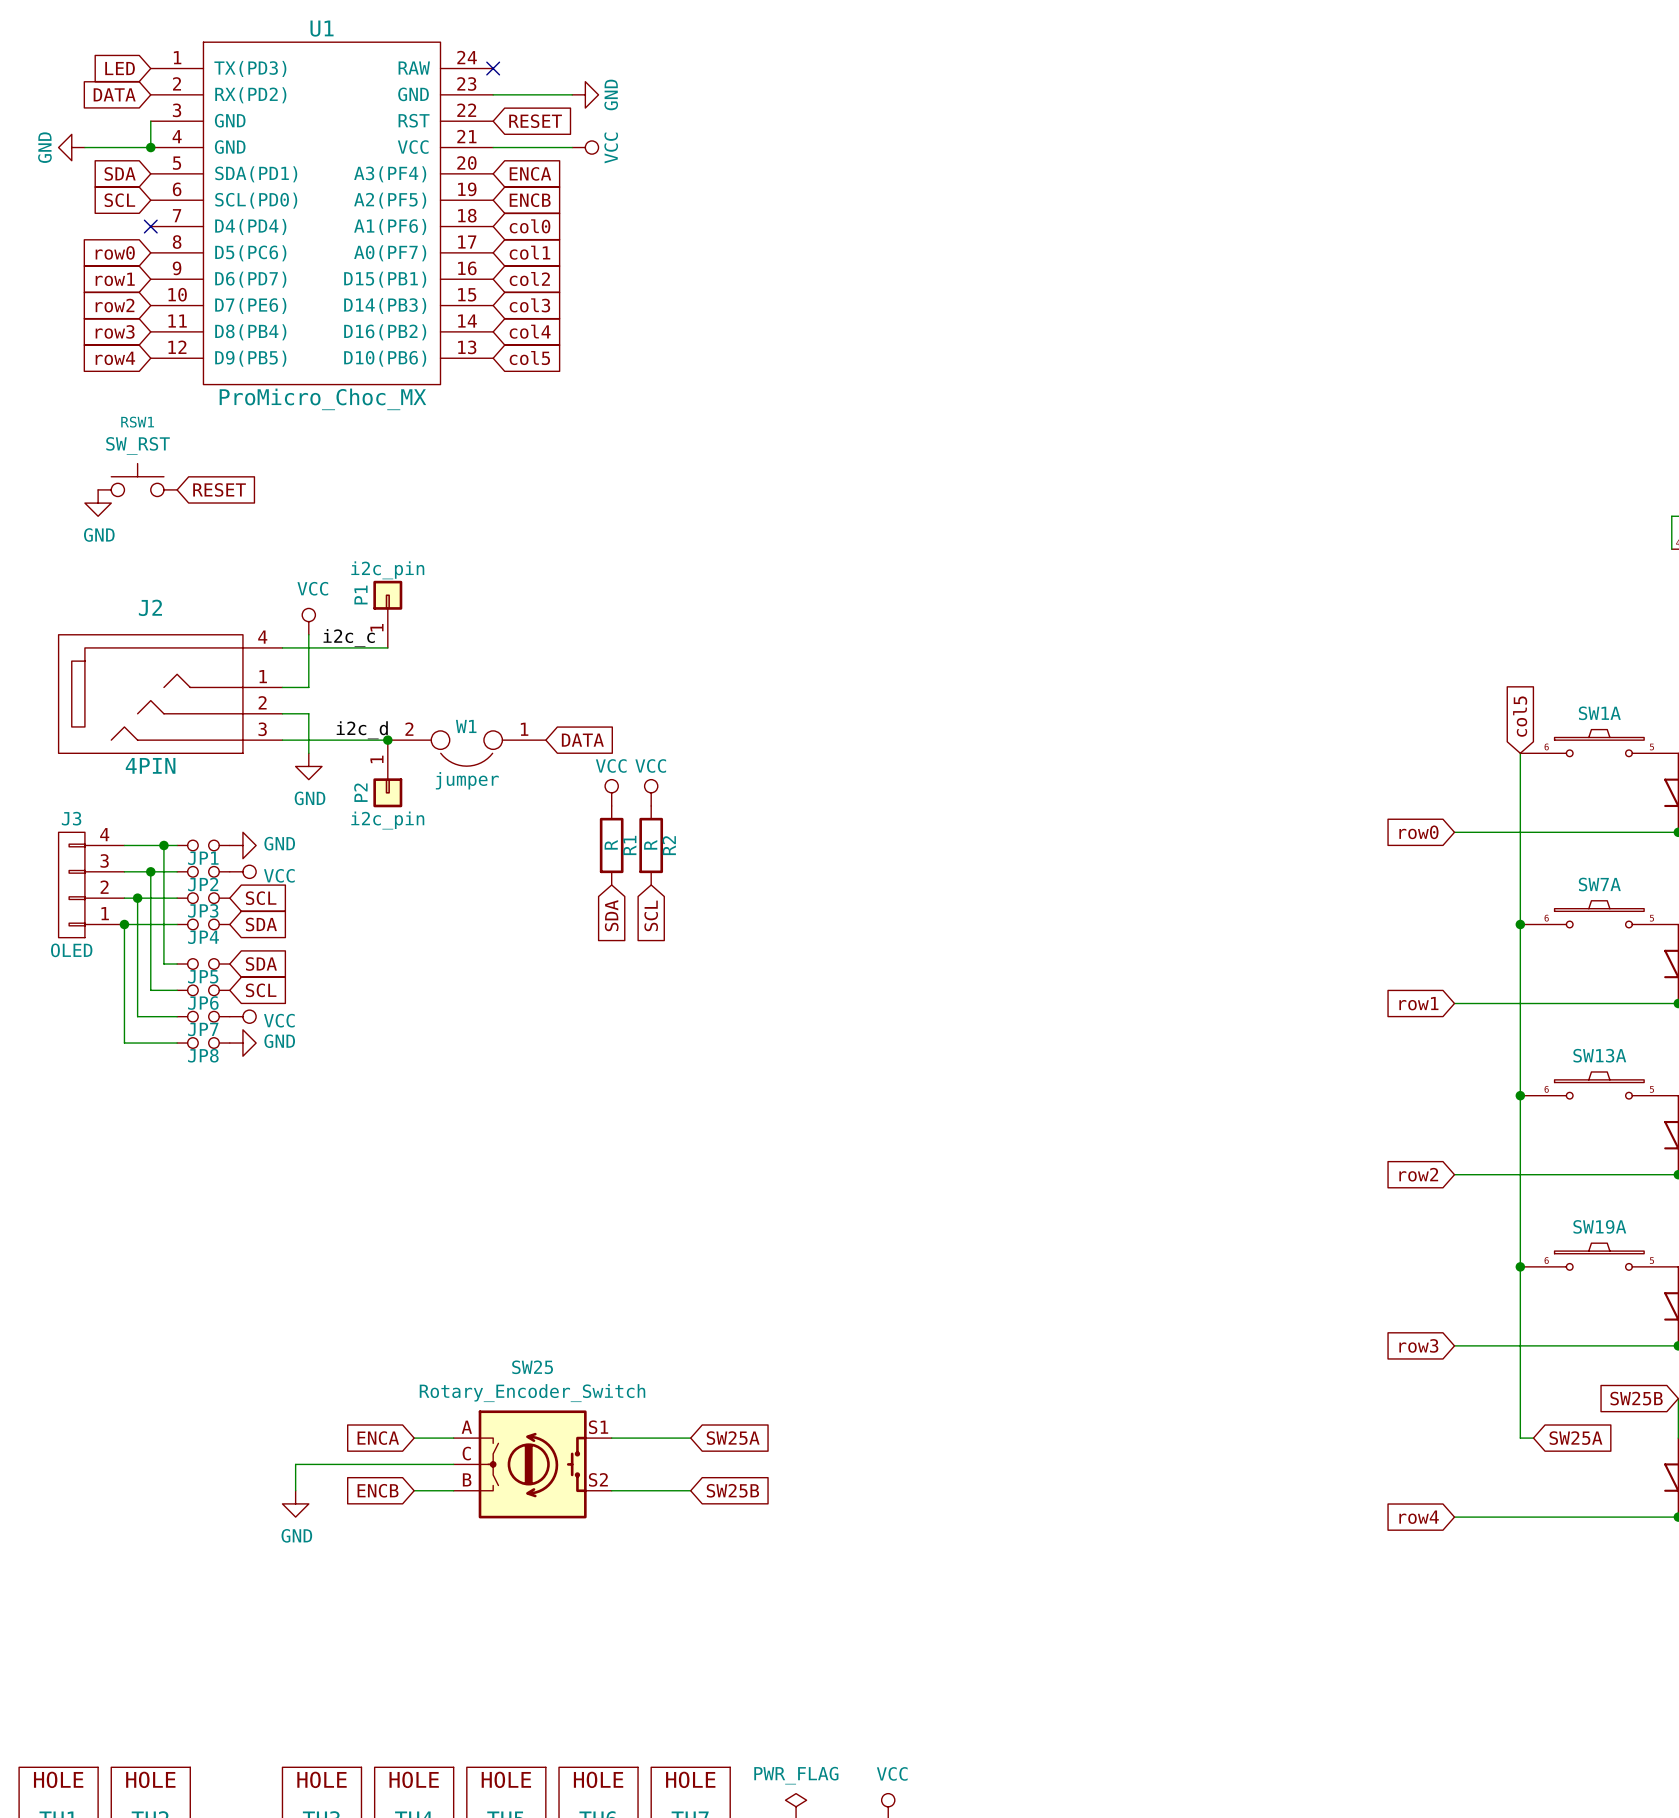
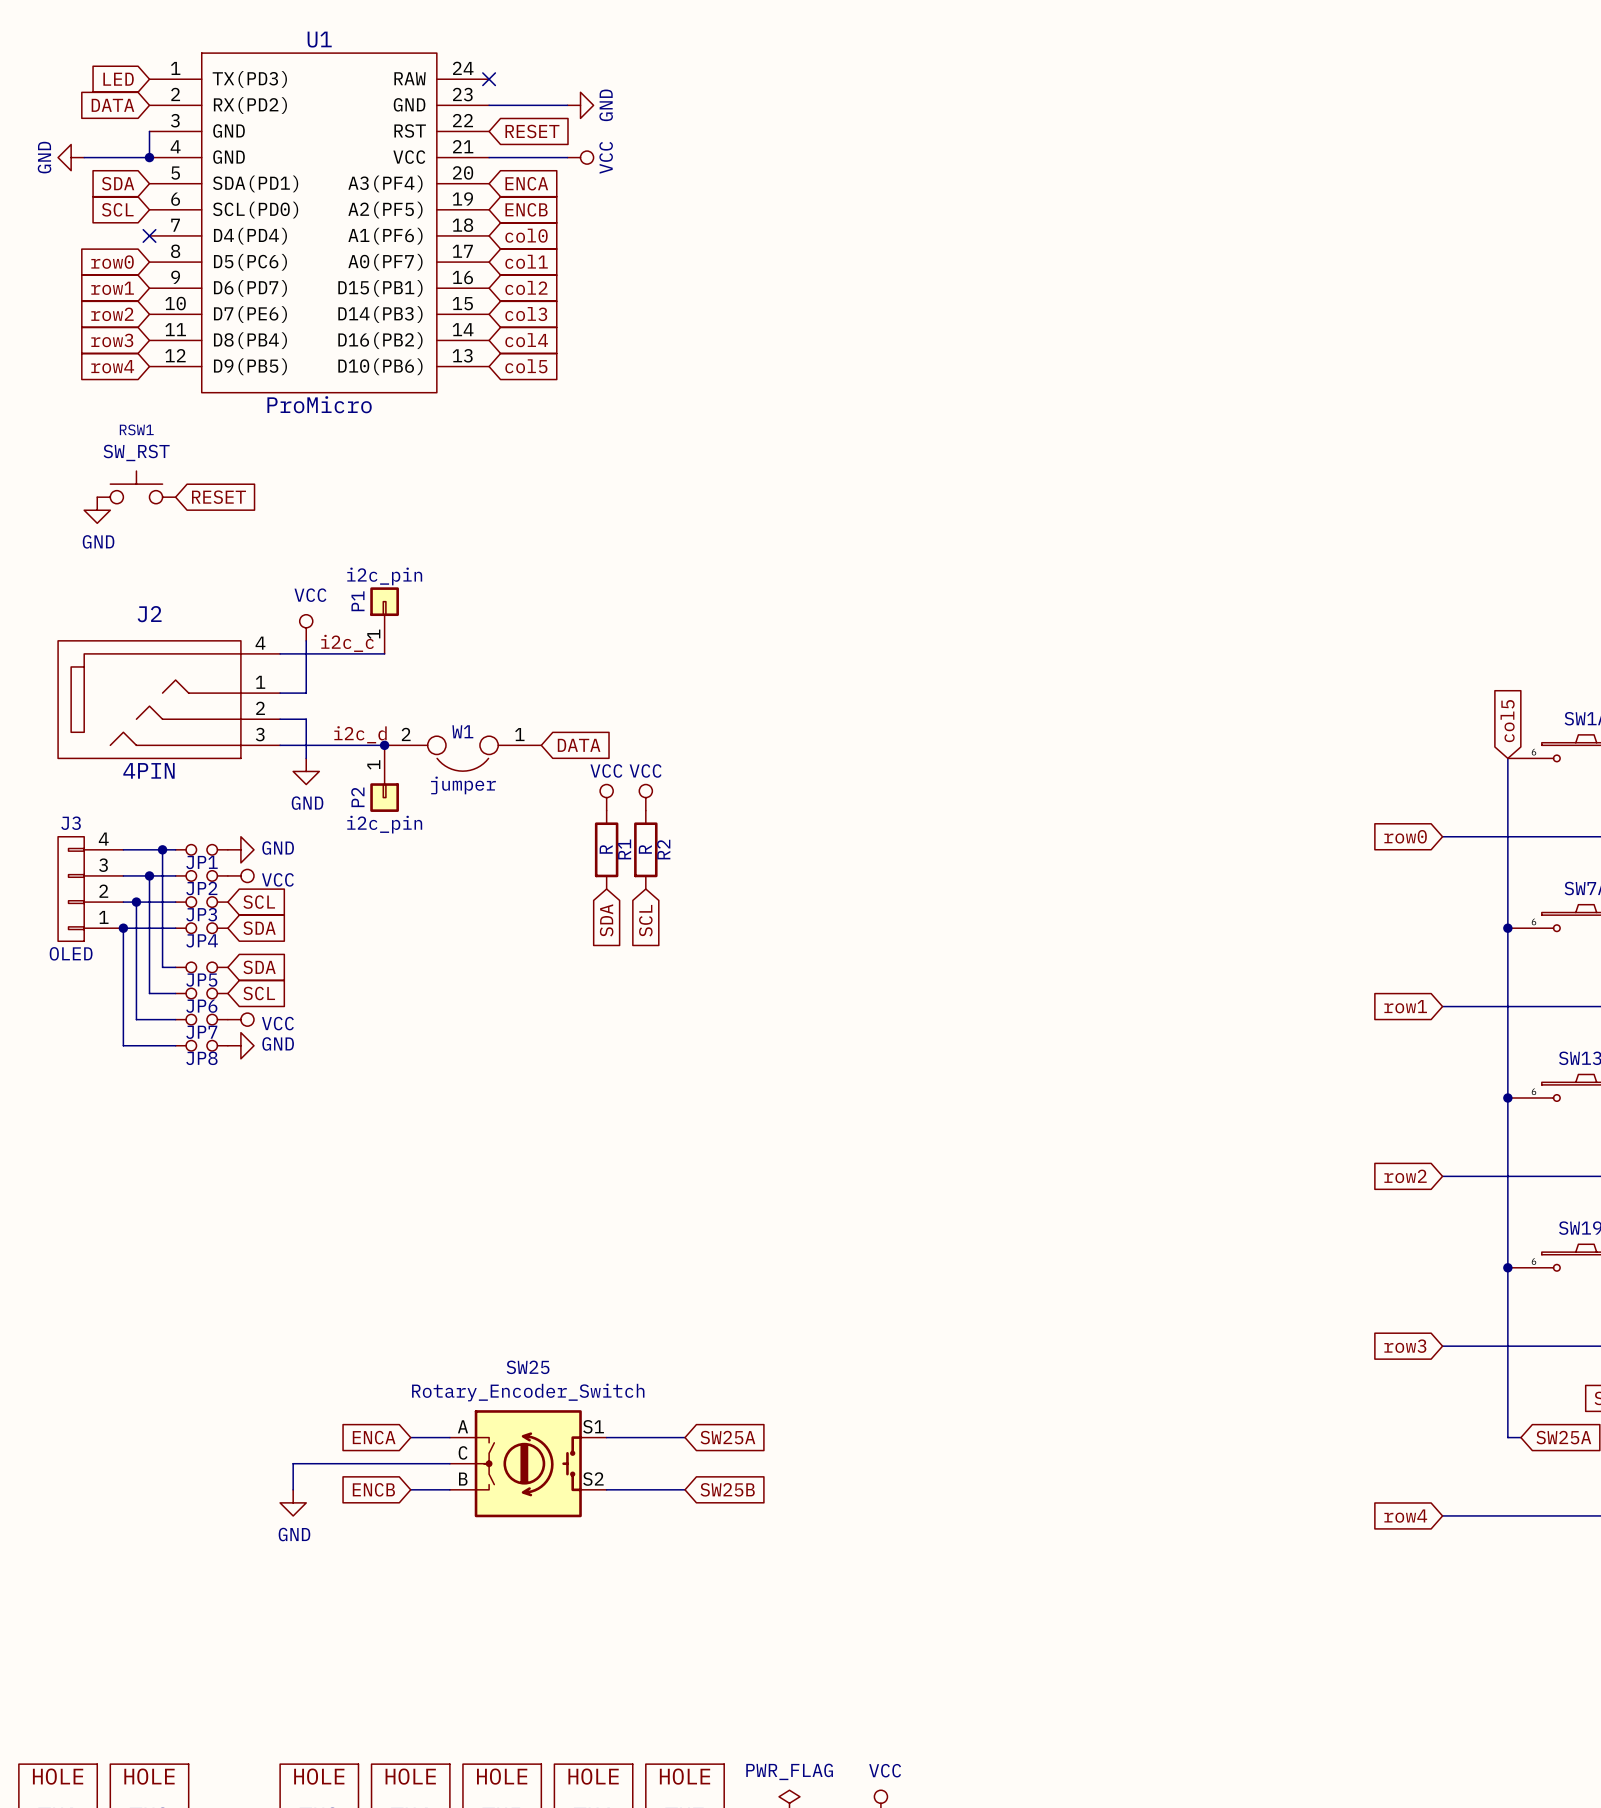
U1 value: ProMicro_Choc_MX (322, 399) -> ProMicro (319, 404)

